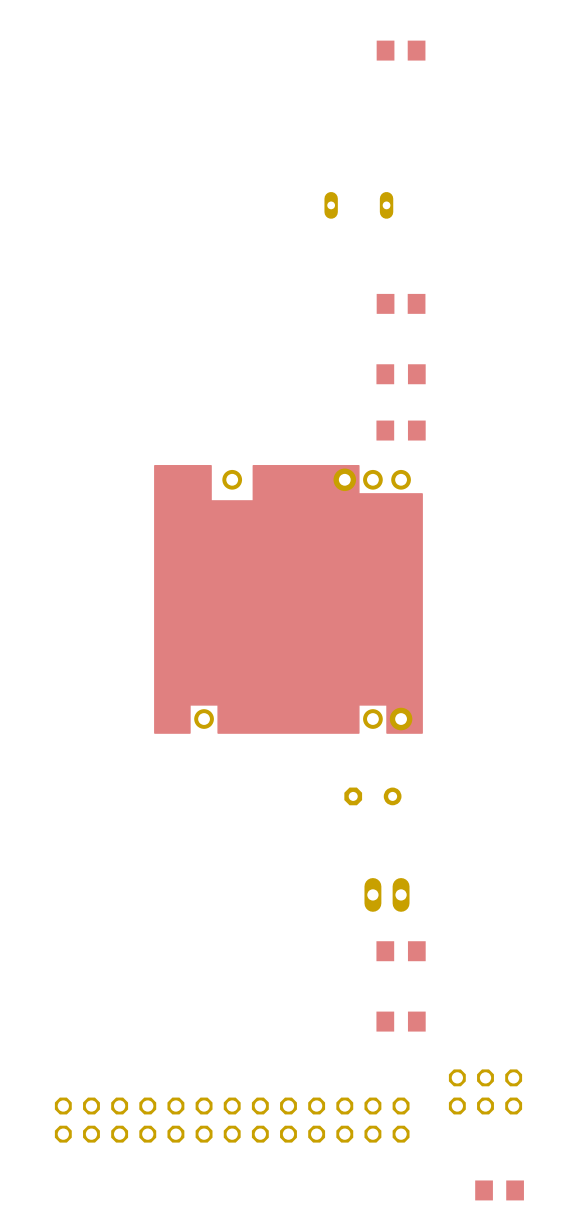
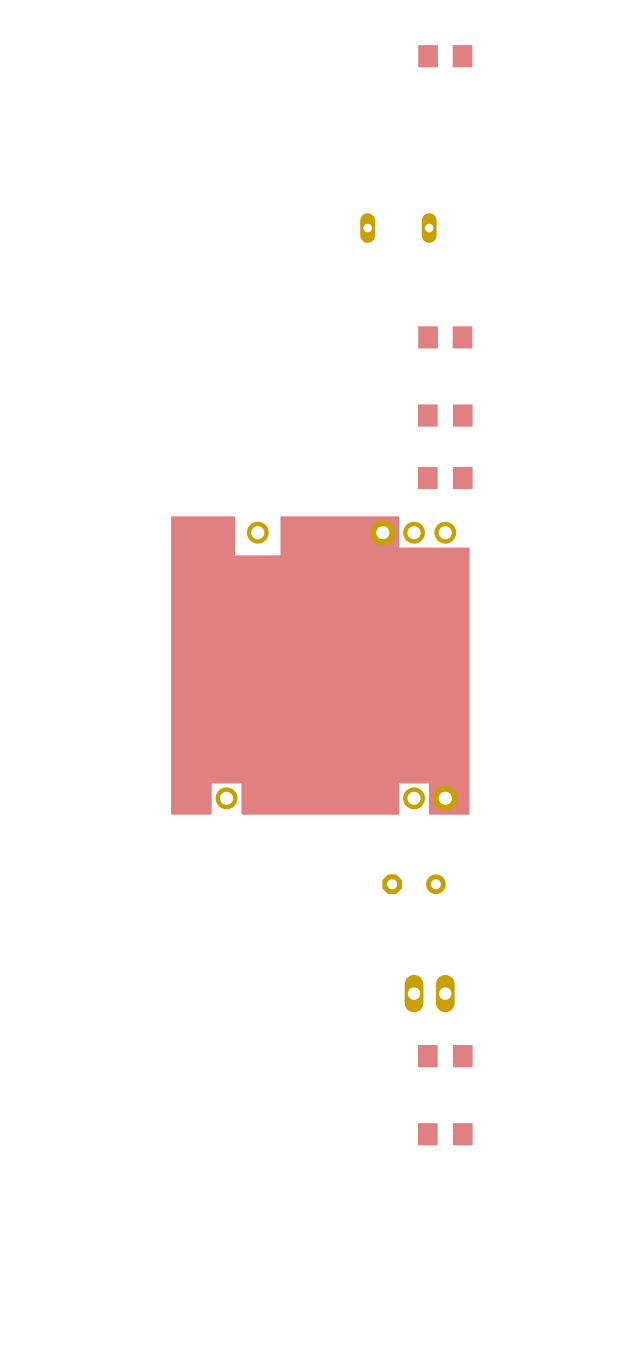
part: (485, 1091) -> none
part: (232, 1120) -> none
part: (499, 1190) -> none

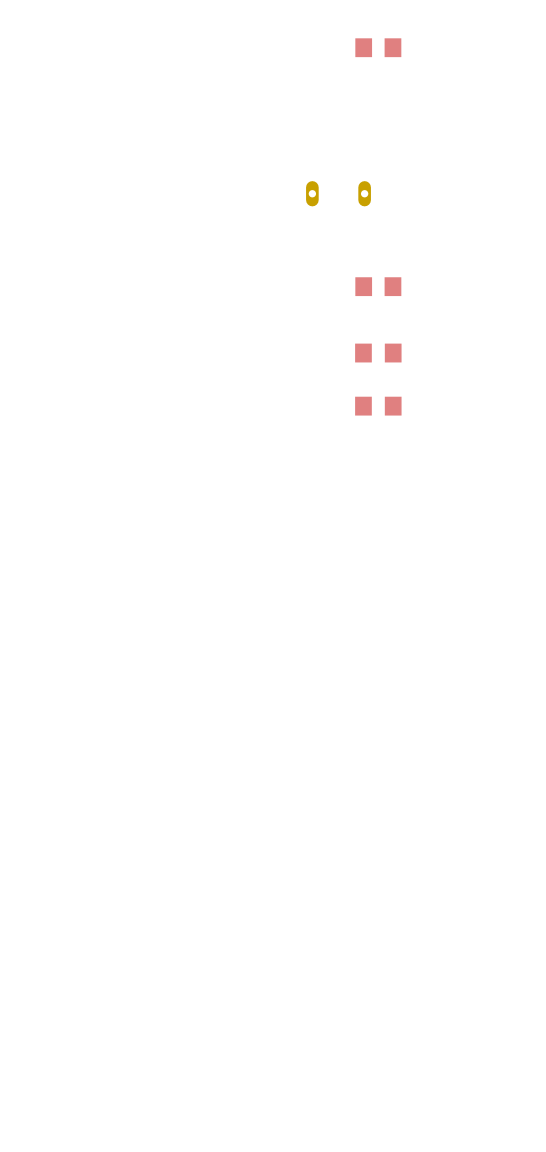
part: (320, 665) -> none
part: (414, 884) -> none
part: (429, 993) -> none
part: (445, 1056) -> none
part: (445, 1134) -> none

